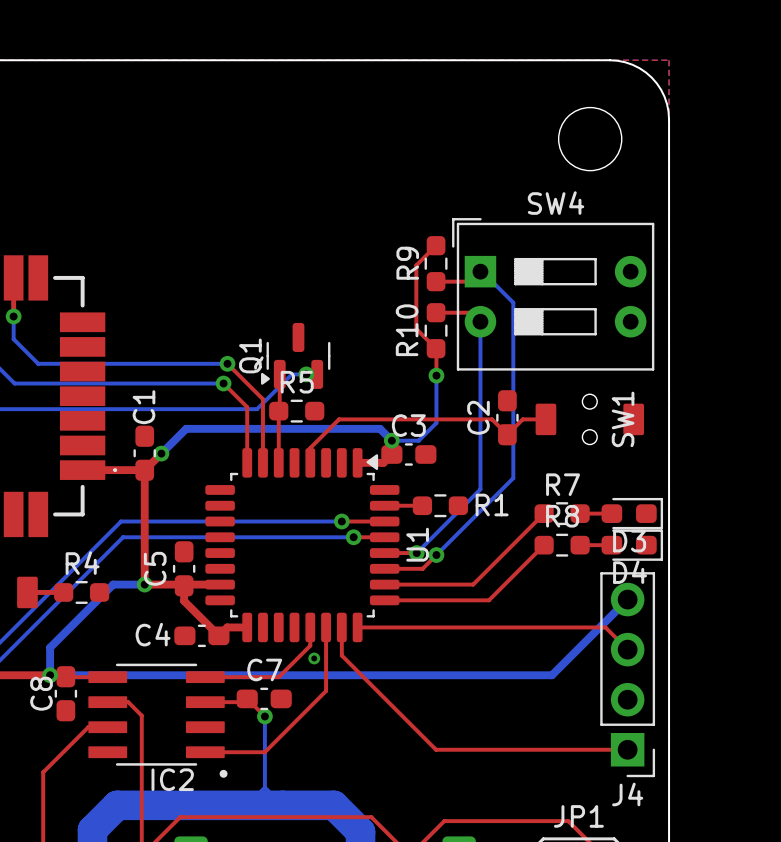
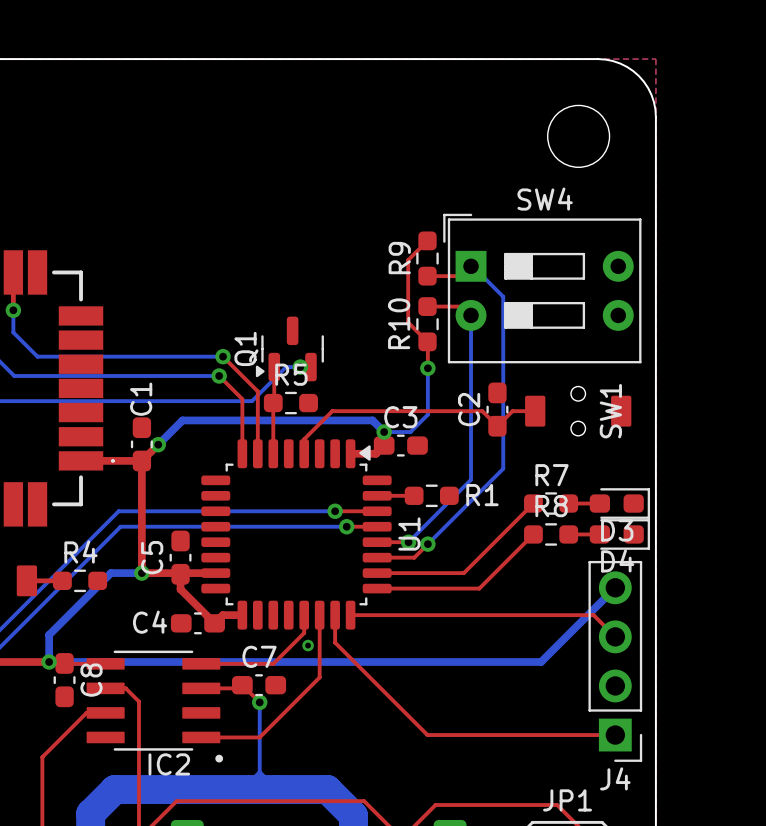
C8 name position: C8 (41, 693) -> C8 (91, 680)

